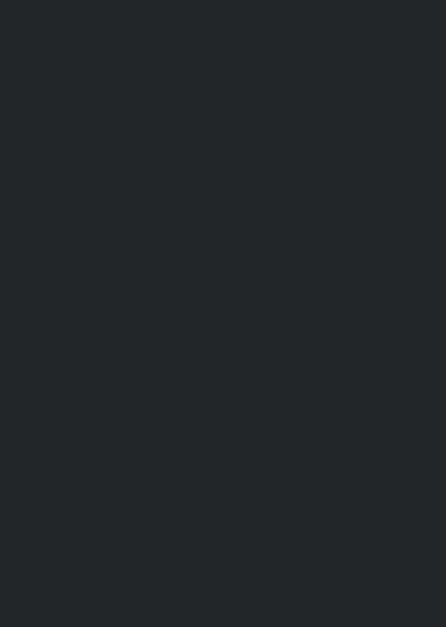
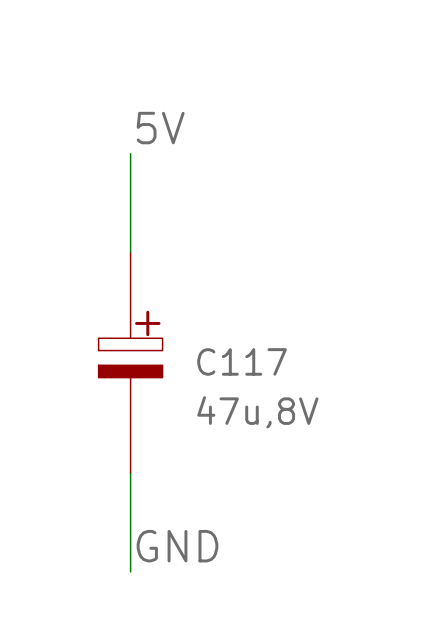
label: none -> 5V (160, 128)
wire: none -> (130, 153) (130, 252)
C117: none -> 47u,8V (130, 362)
wire: none -> (130, 473) (130, 571)
label: none -> GND (177, 546)

